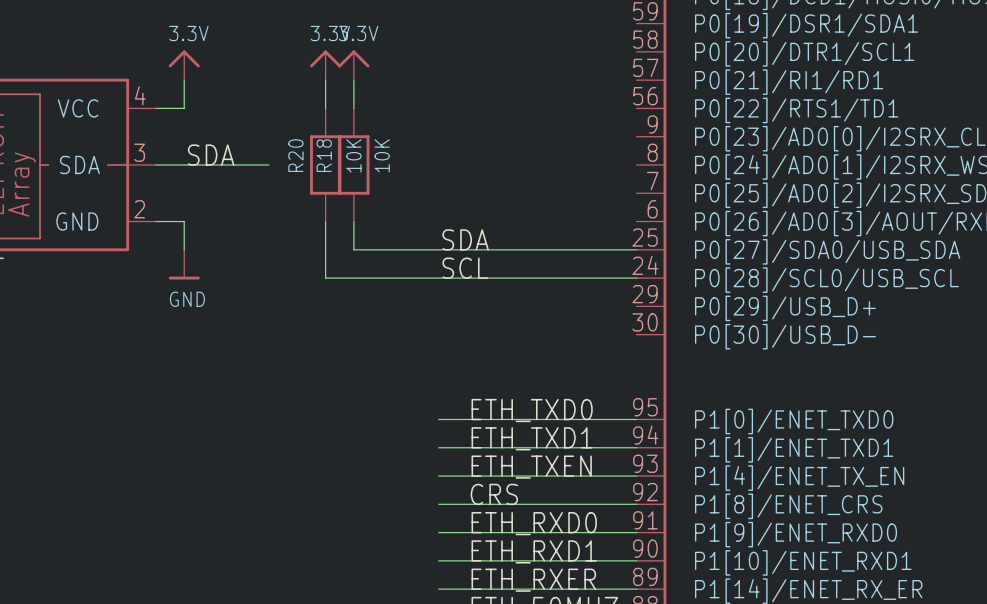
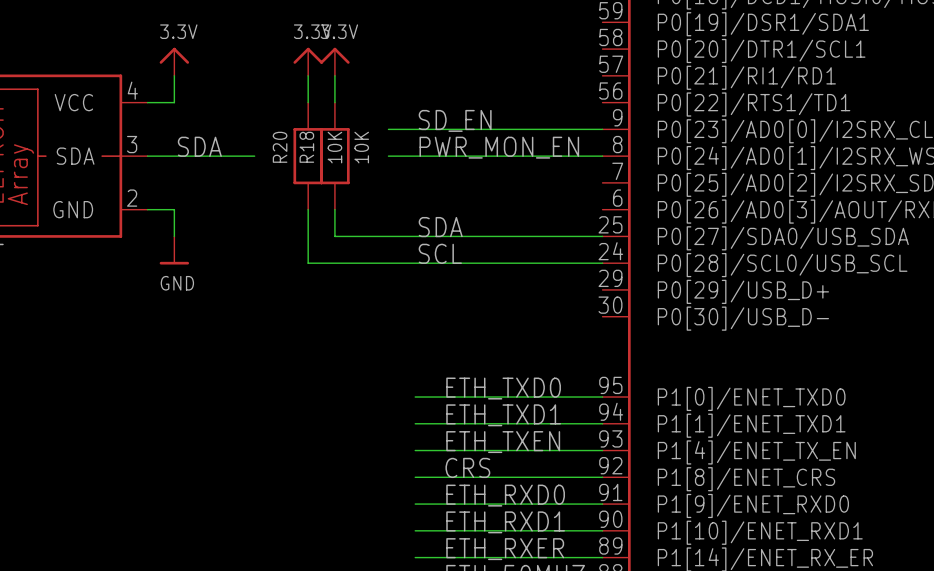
label: none -> SD_EN (455, 120)
wire: none -> (388, 129) (602, 129)
label: none -> PWR_MON_EN (499, 147)
wire: none -> (388, 156) (602, 156)

